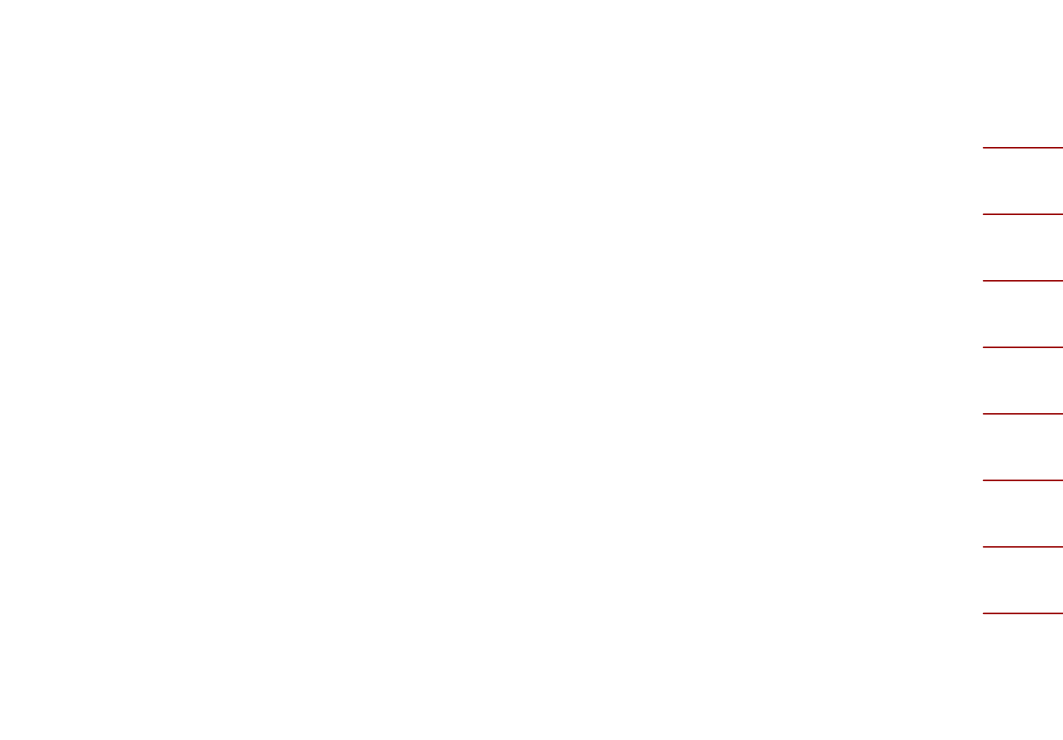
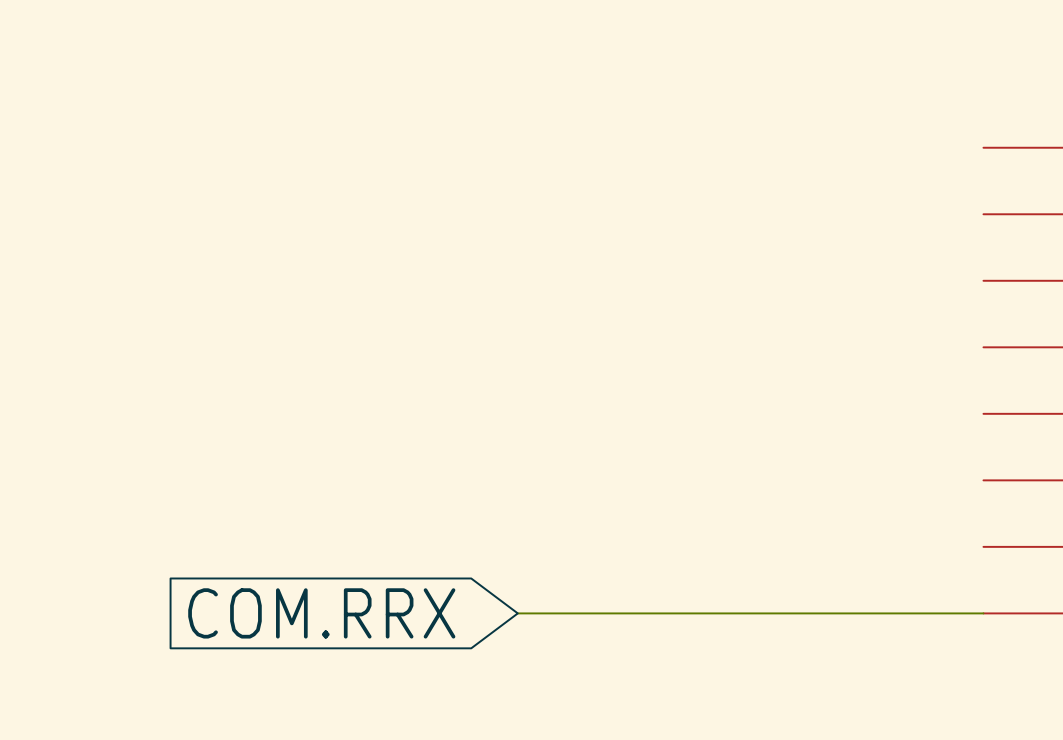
global label: none -> COM.RRX (321, 613)
wire: none -> (517, 613) (983, 613)

